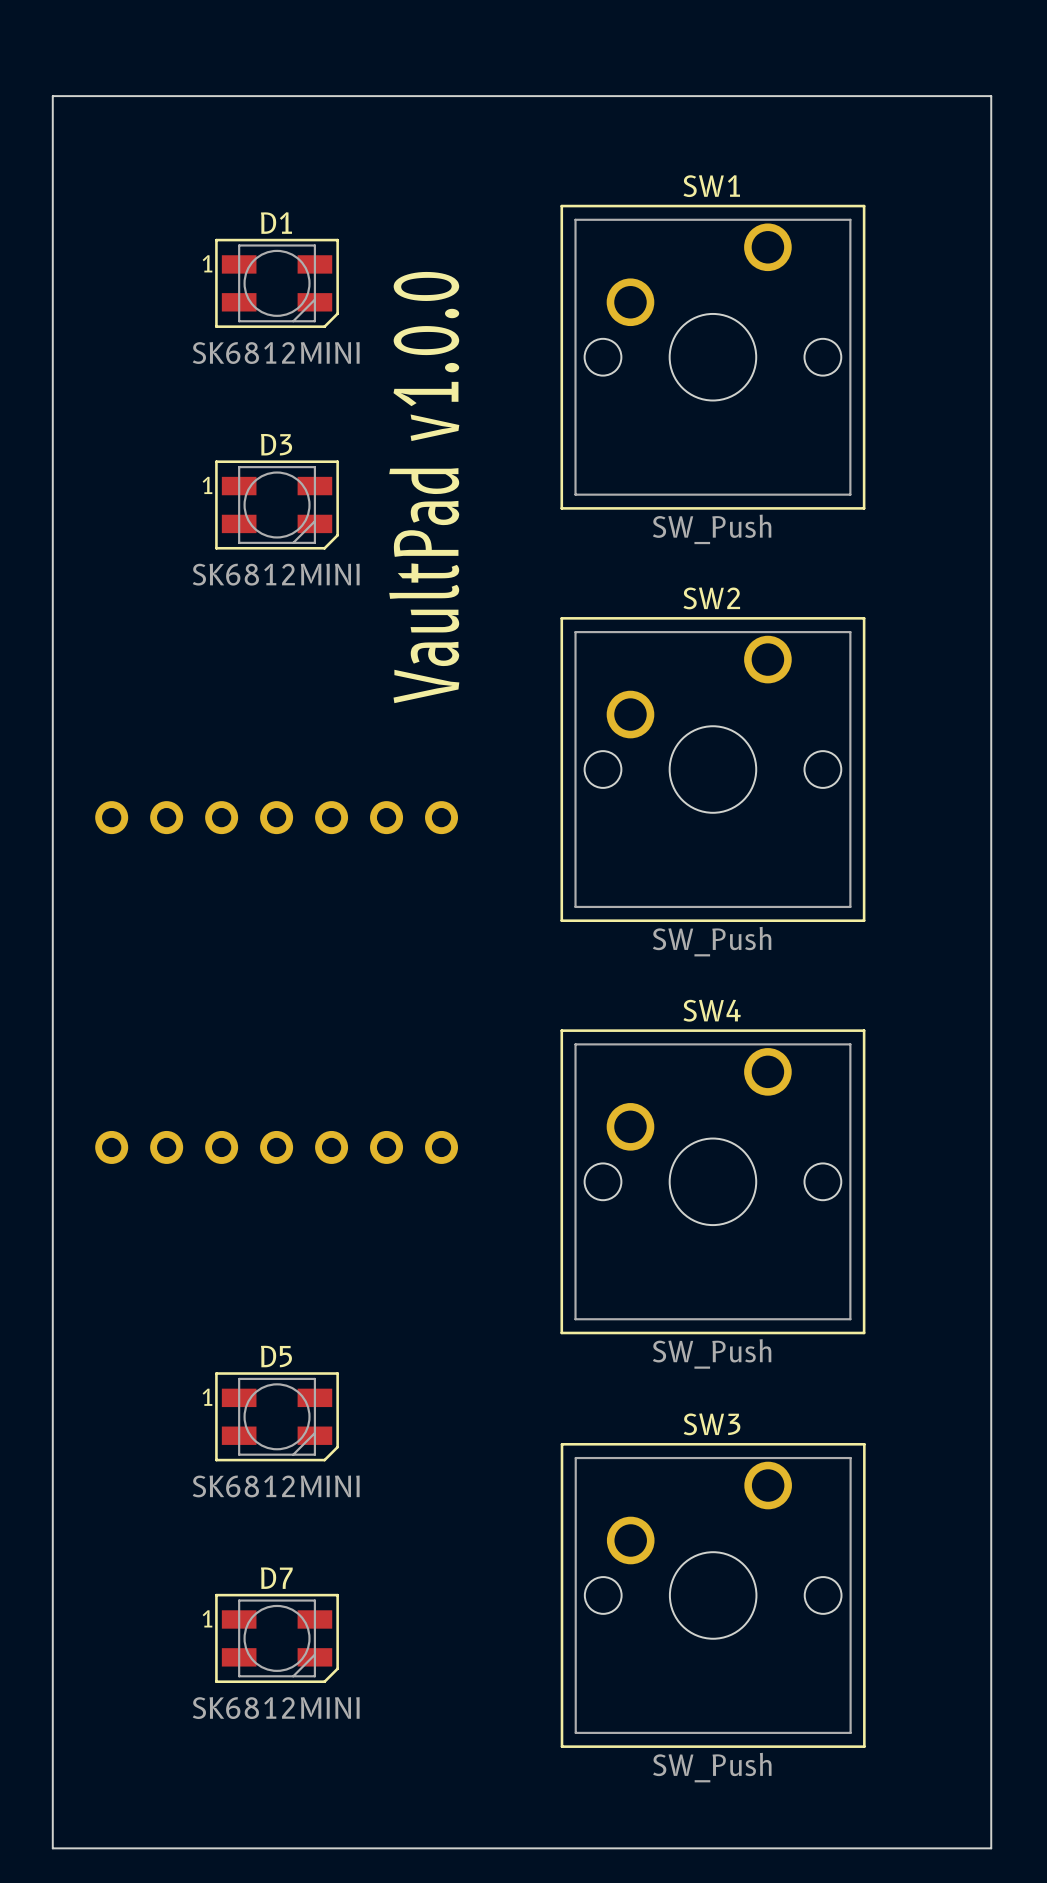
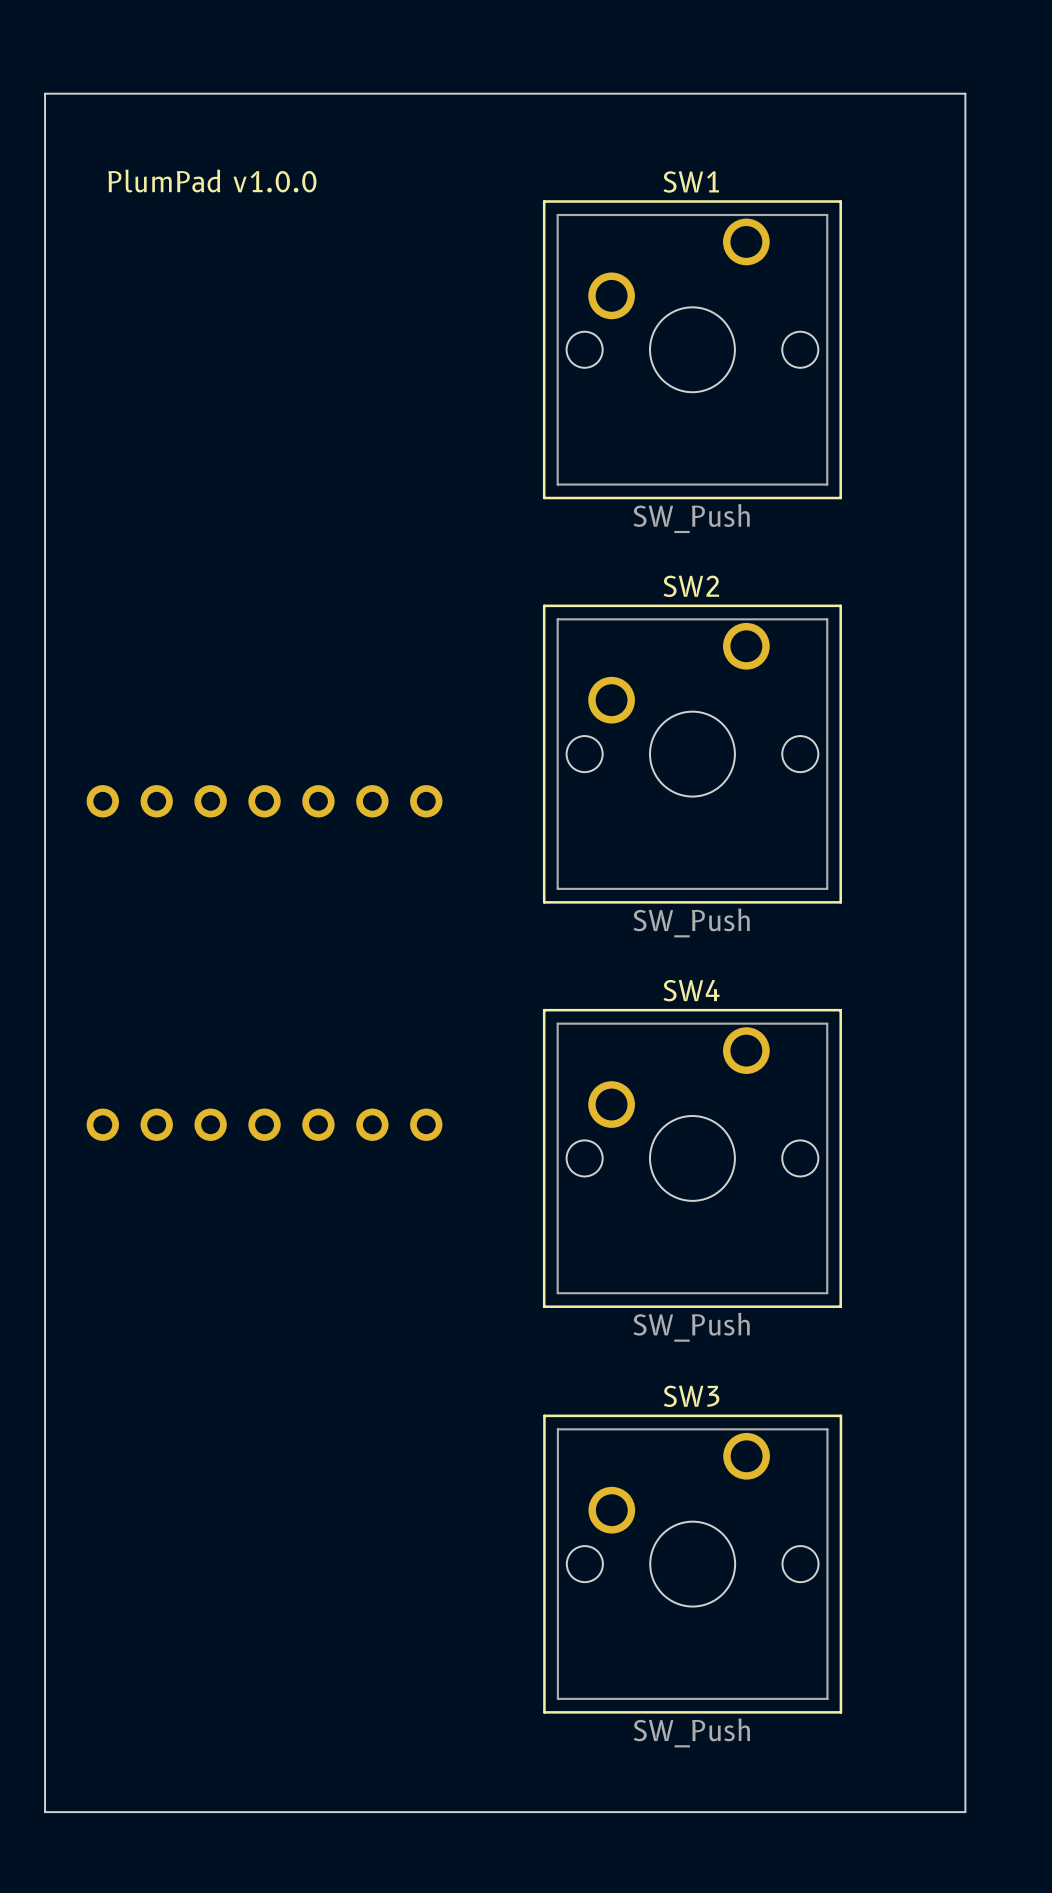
text: none -> PlumPad v1.0.0 (212, 181)
D1: SK6812MINI (277, 283) -> none
text: VaultPad v1.0.0 (424, 487) -> none
D3: SK6812MINI (277, 504) -> none
D5: SK6812MINI (277, 1416) -> none
D7: SK6812MINI (277, 1638) -> none

